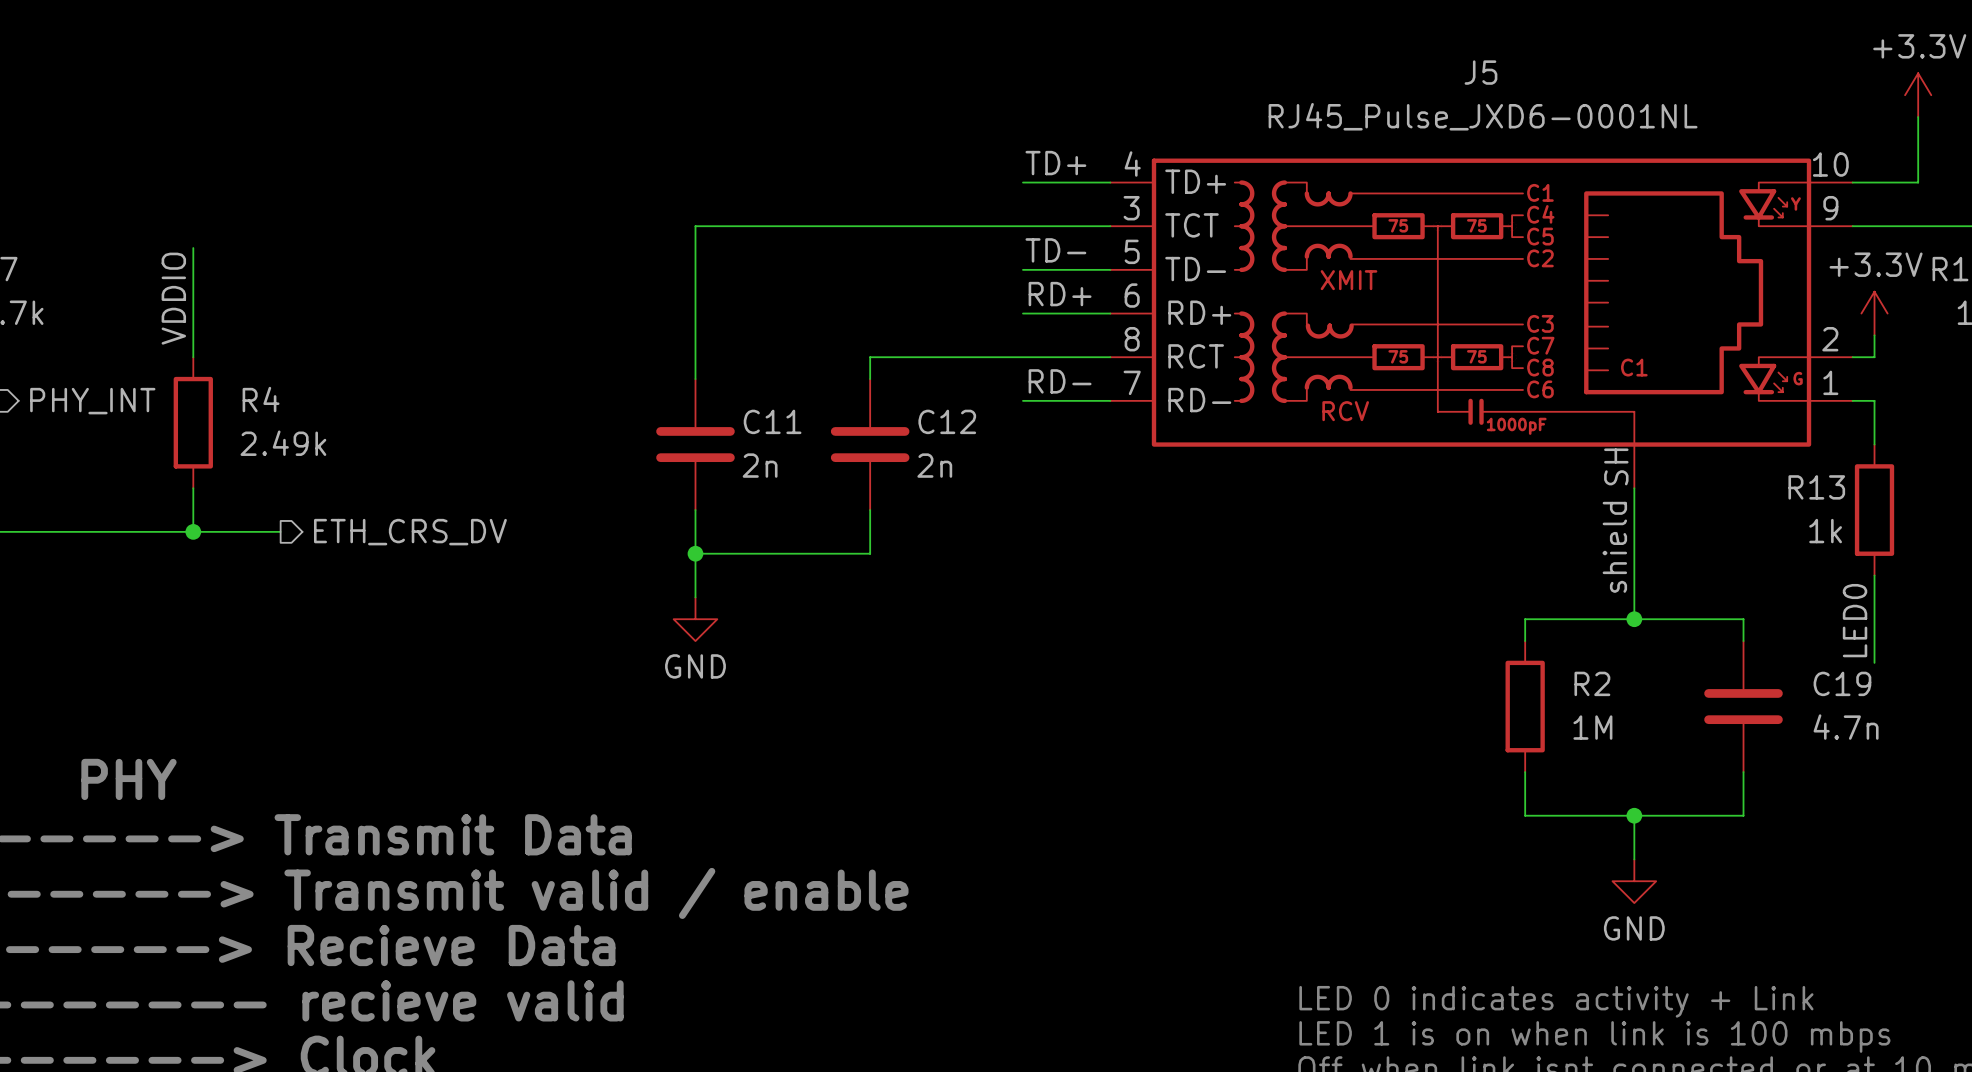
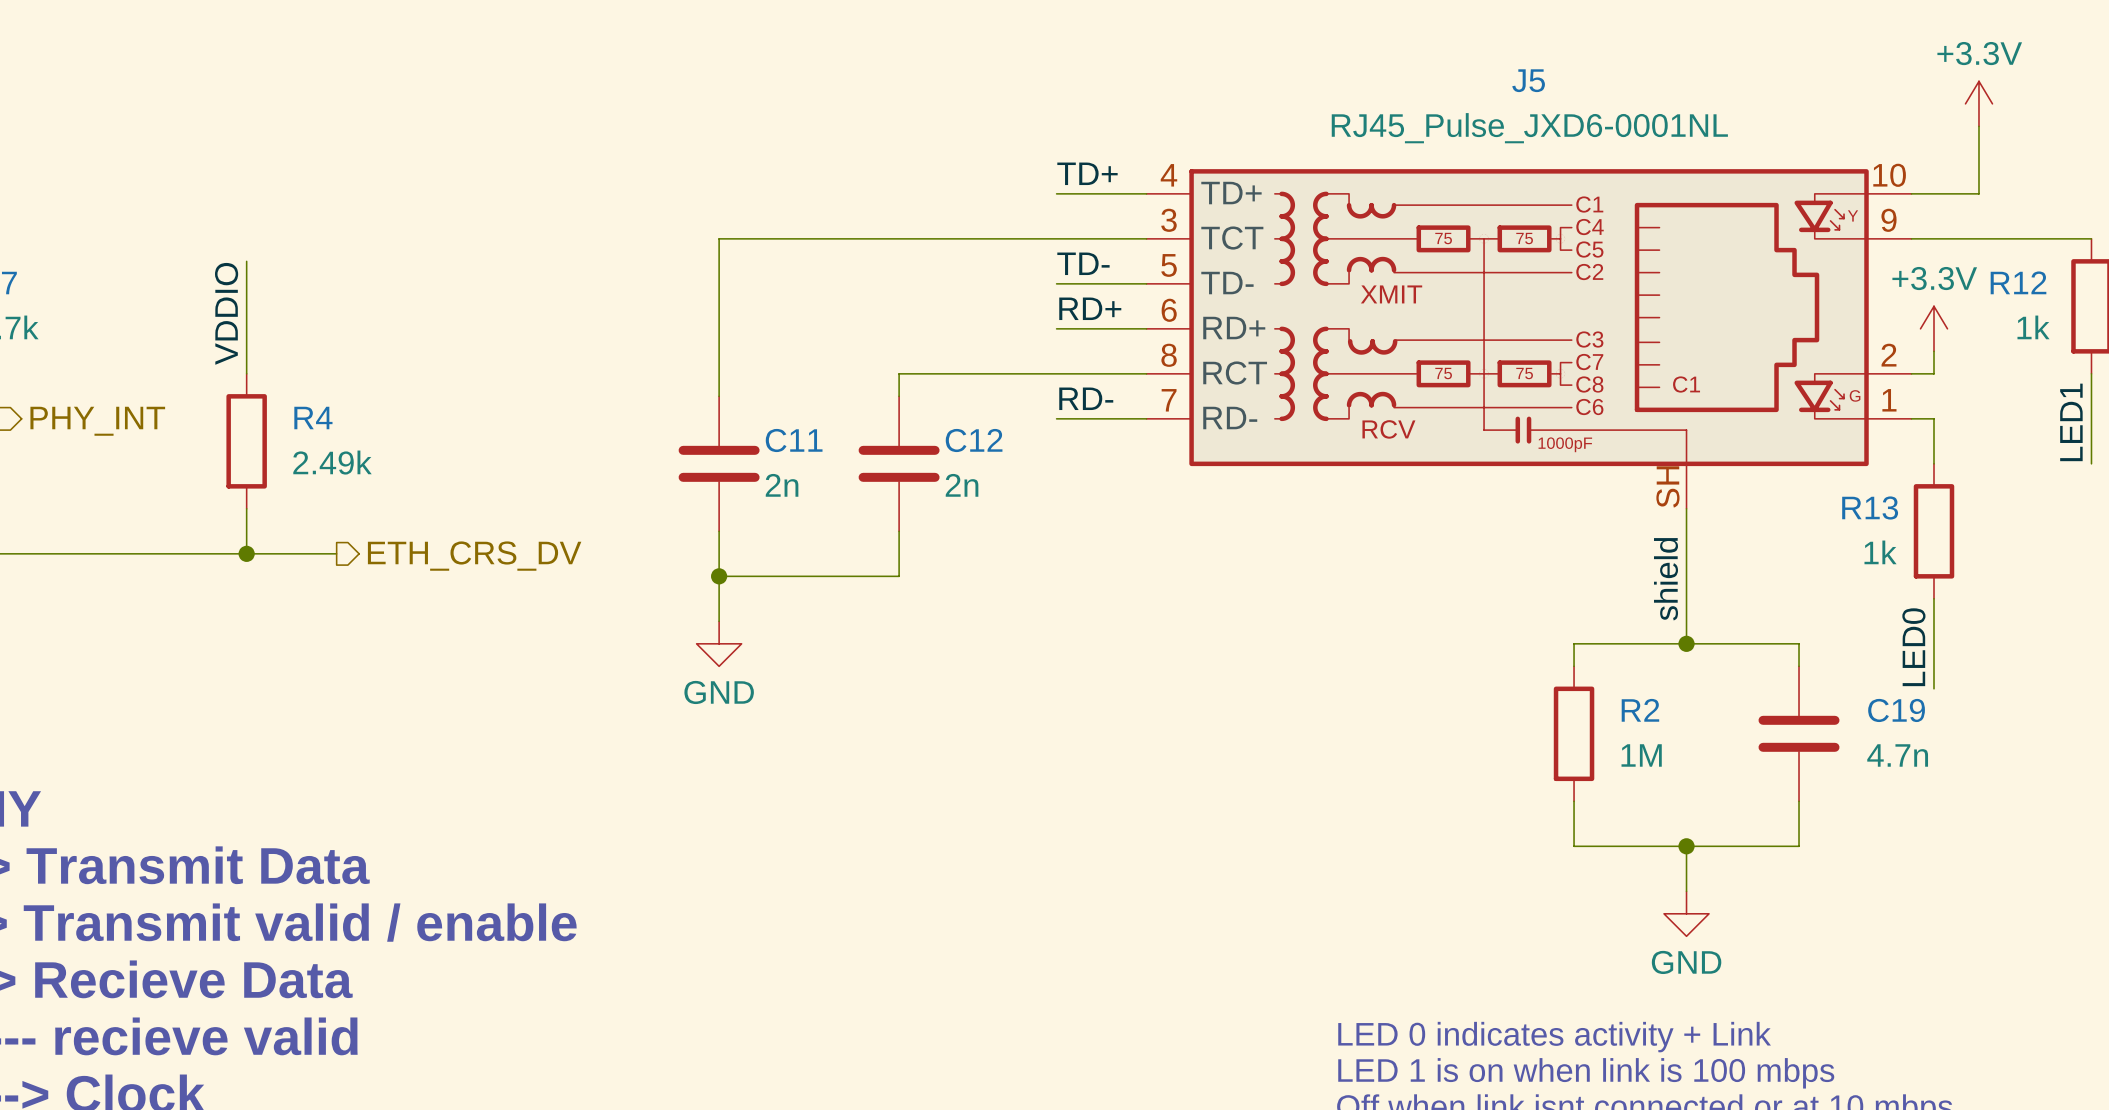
wire: (193, 248) (193, 357) -> (246, 261) (246, 373)
label position: VDDIO (173, 298) -> VDDIO (226, 313)
R4 position: (193, 422) -> (246, 441)
wire: (193, 488) (193, 531) -> (246, 508) (246, 553)
junction position: (193, 531) -> (246, 553)
wire: none -> (291, 553) (336, 553)
hierarchical label position: ETH_CRS_DV (410, 532) -> ETH_CRS_DV (474, 556)

